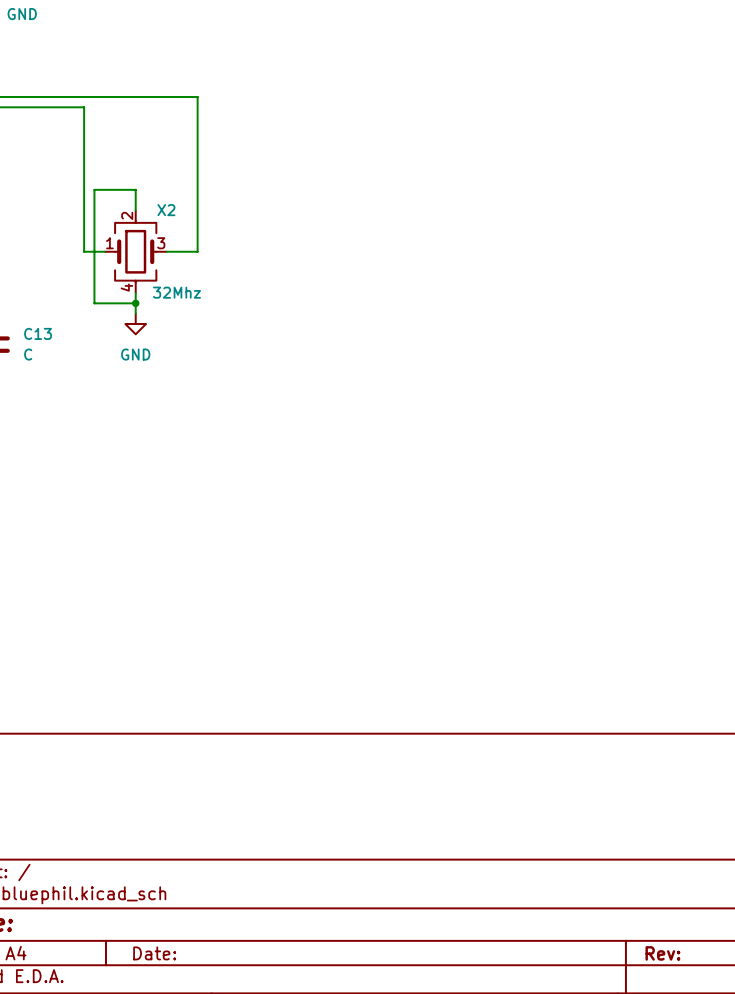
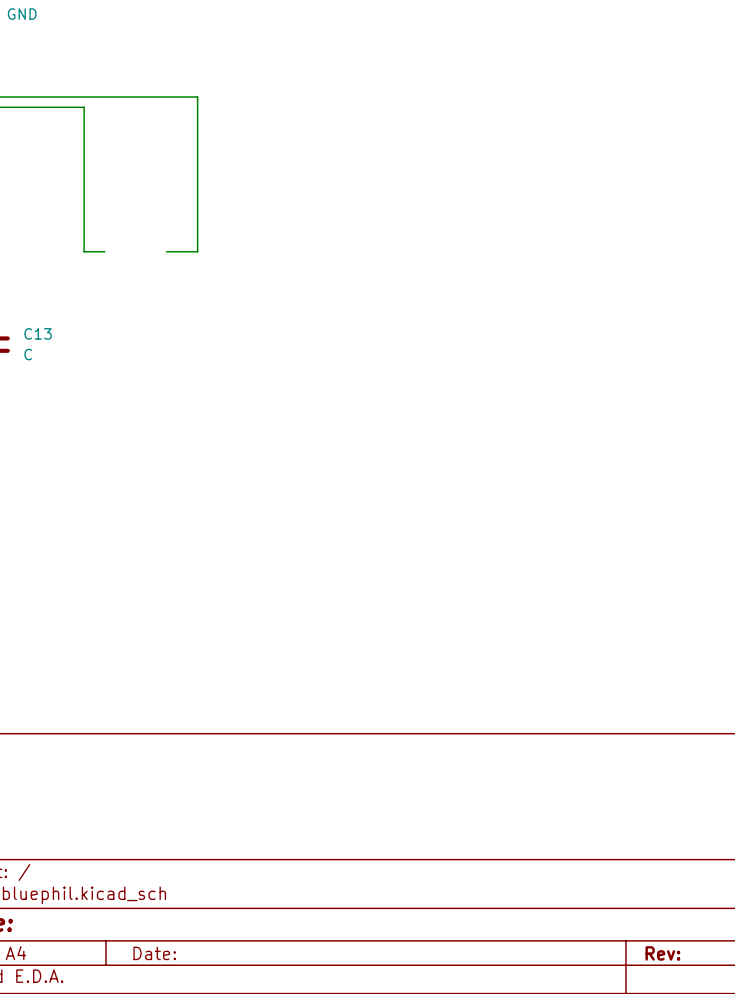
wire: (135, 210) (135, 189) (94, 189) (94, 303) (135, 303) -> none
X2: 32Mhz (135, 251) -> none
wire: (135, 293) (135, 313) -> none
junction: (135, 303) -> none
power symbol: GND (135, 323) -> none

